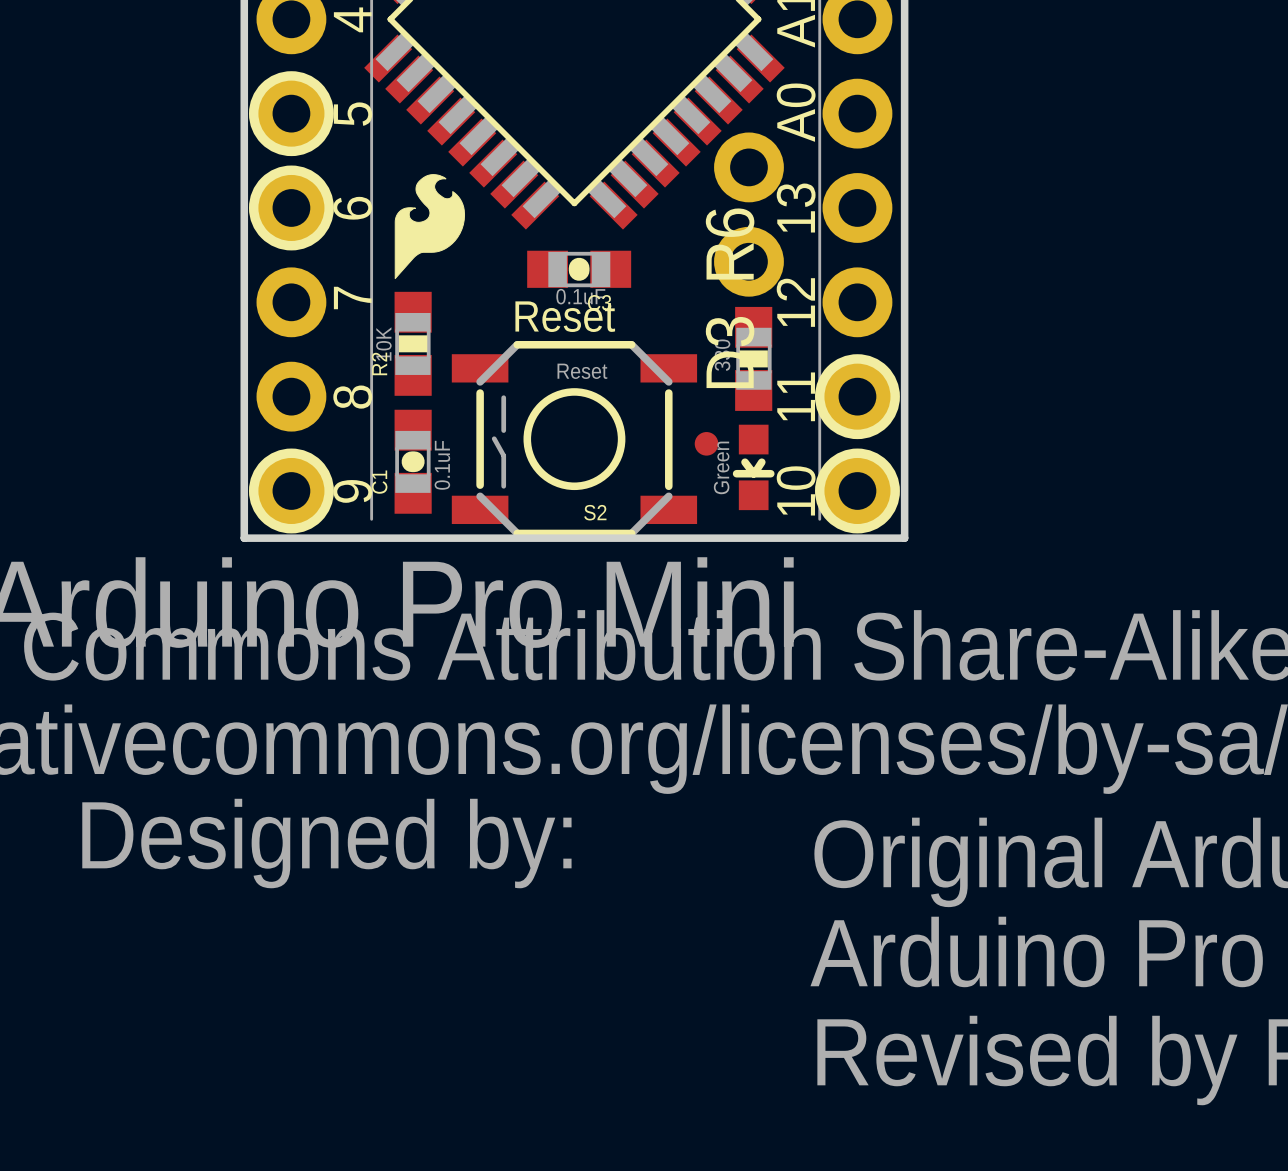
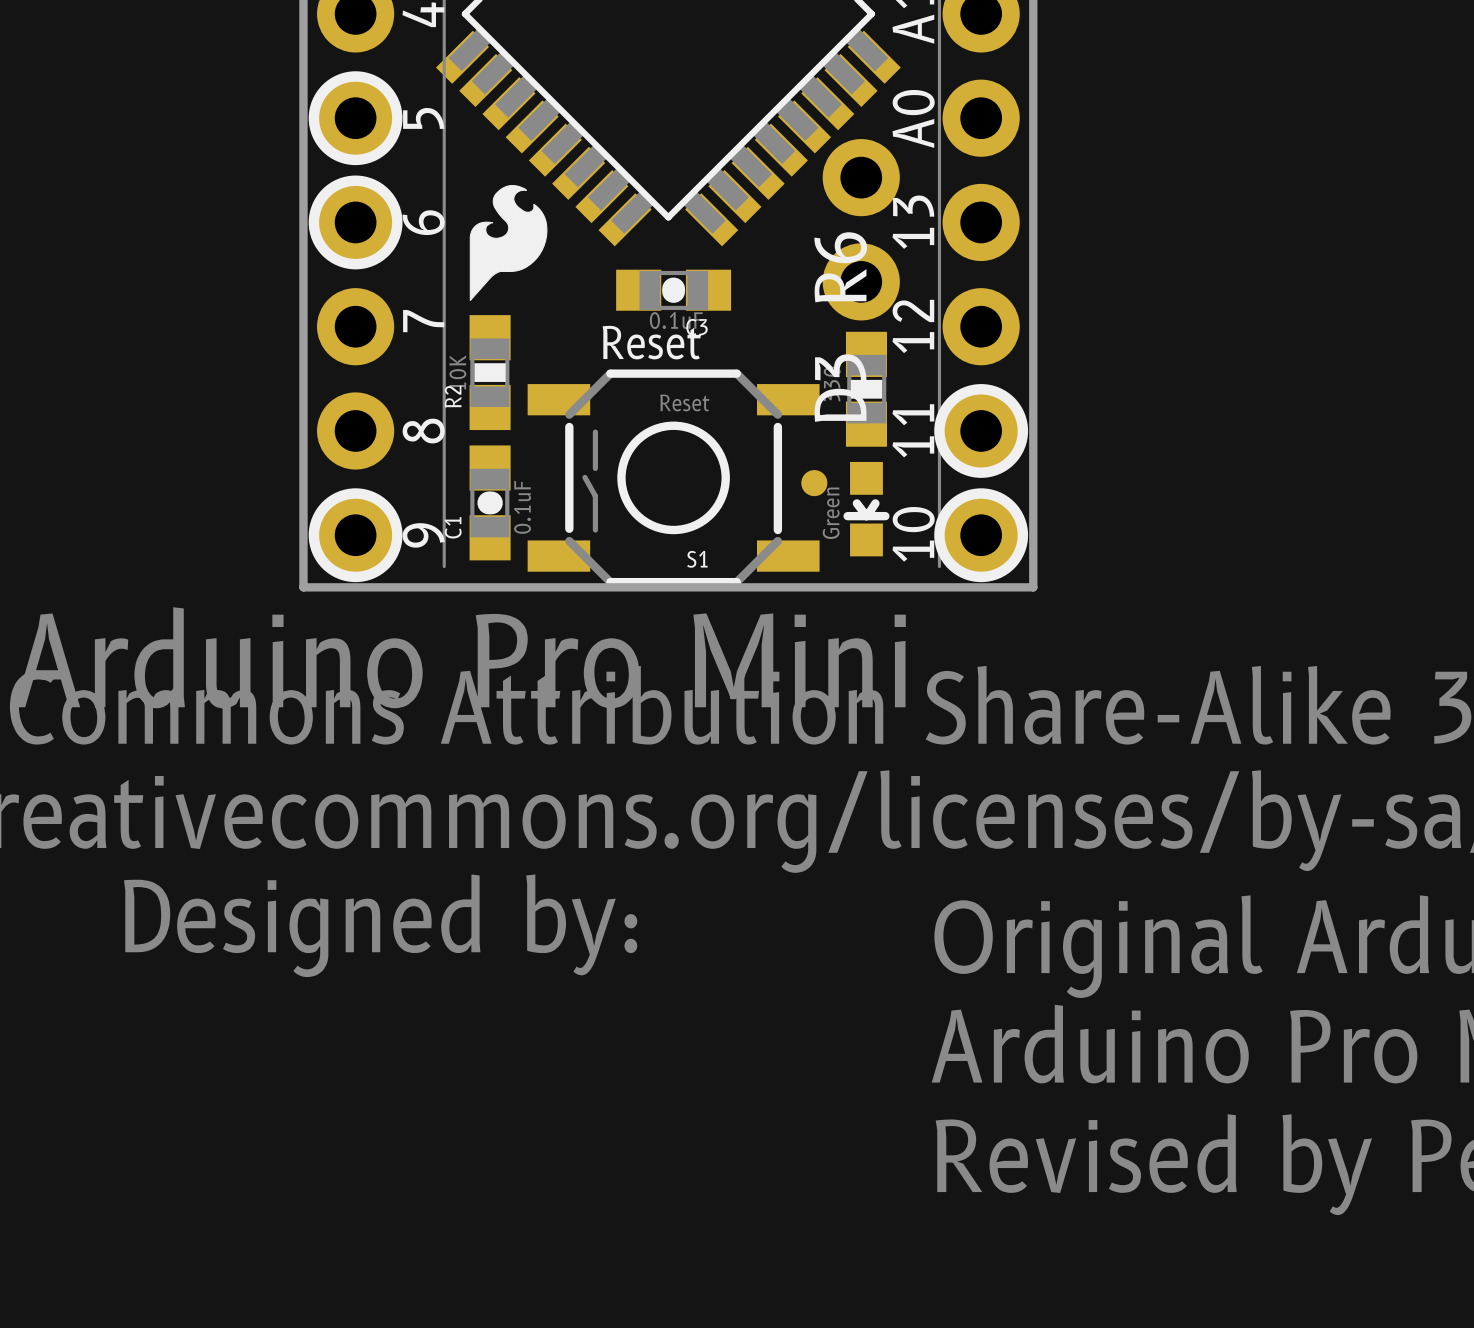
S2: Reset (574, 439) -> none
S1: none -> Reset (673, 477)

